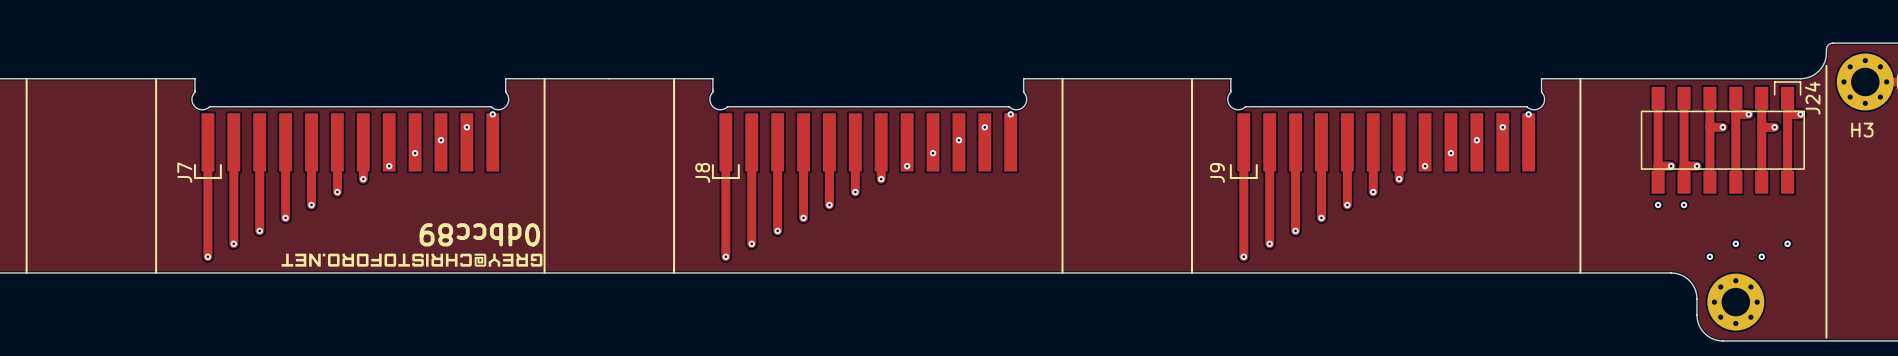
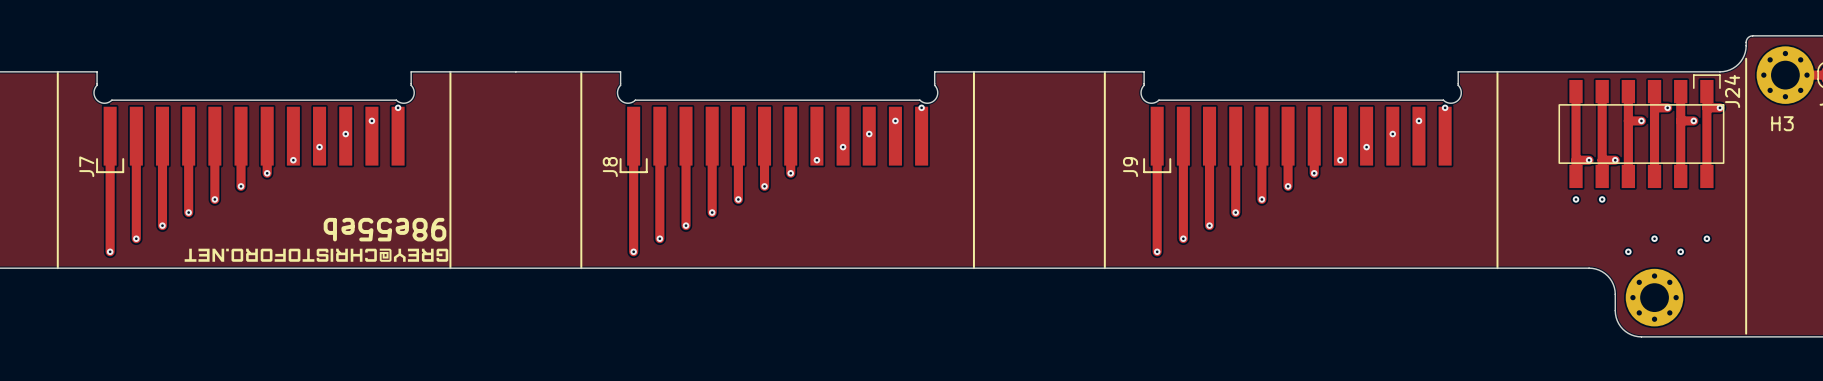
text: 0dbcc89 (479, 234) -> 98e55eb (384, 229)

